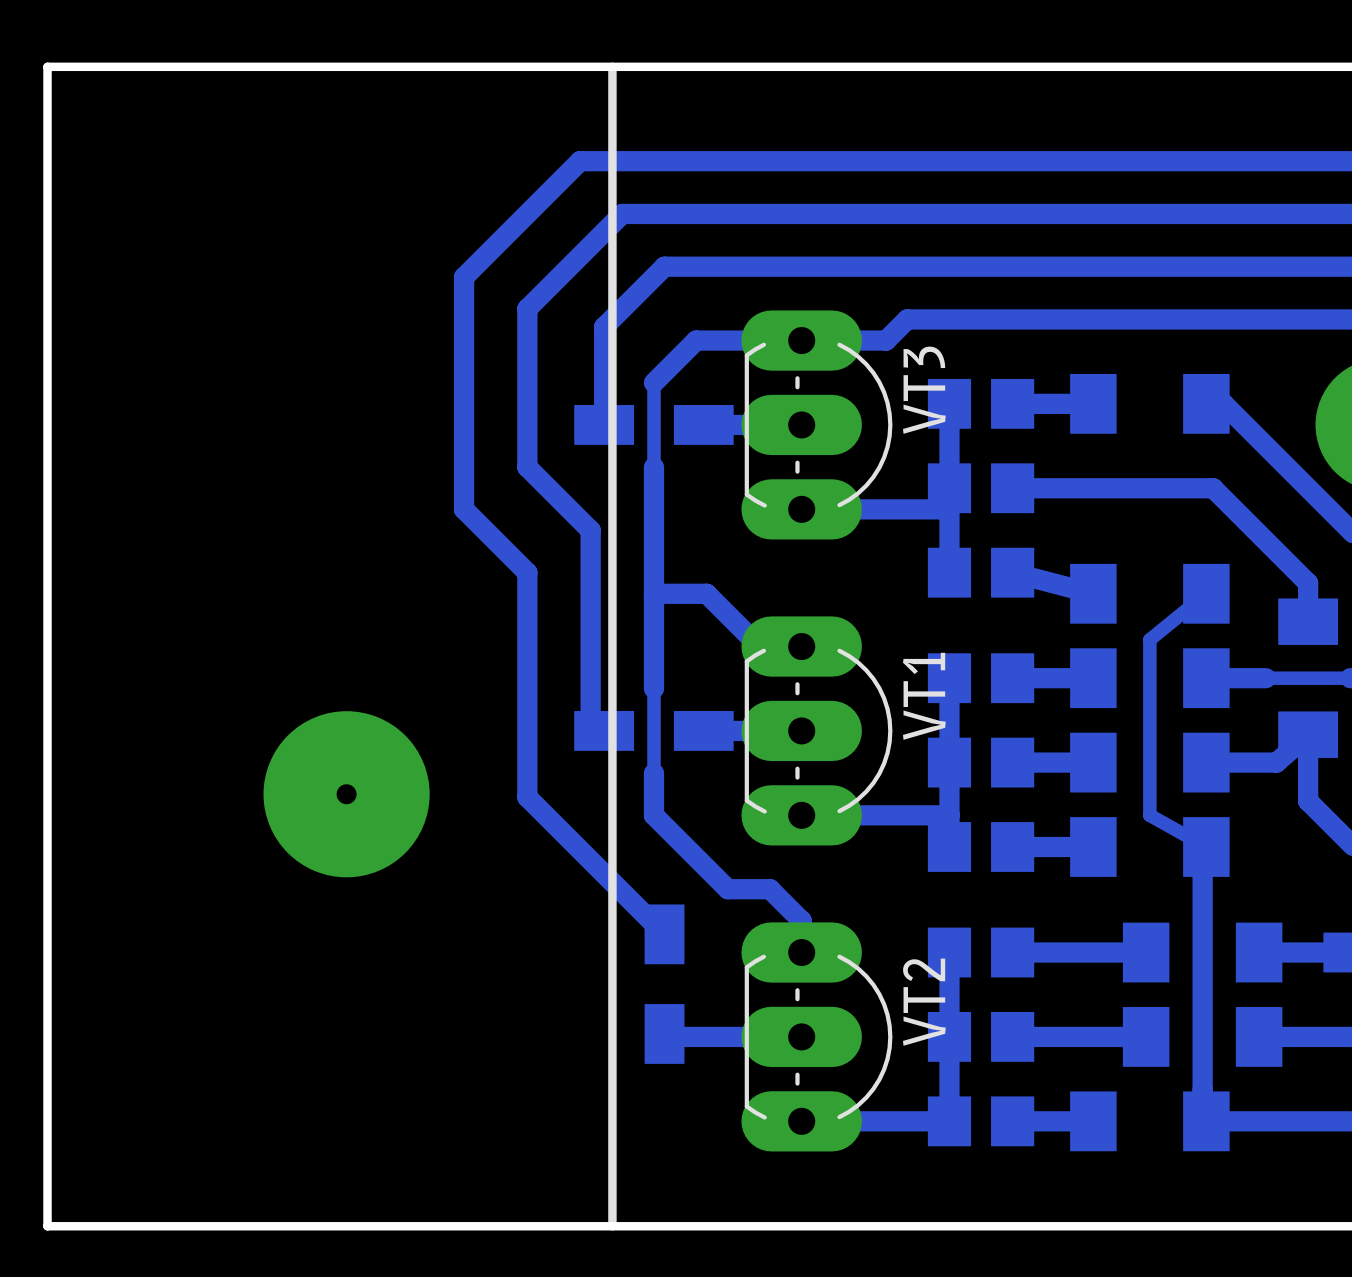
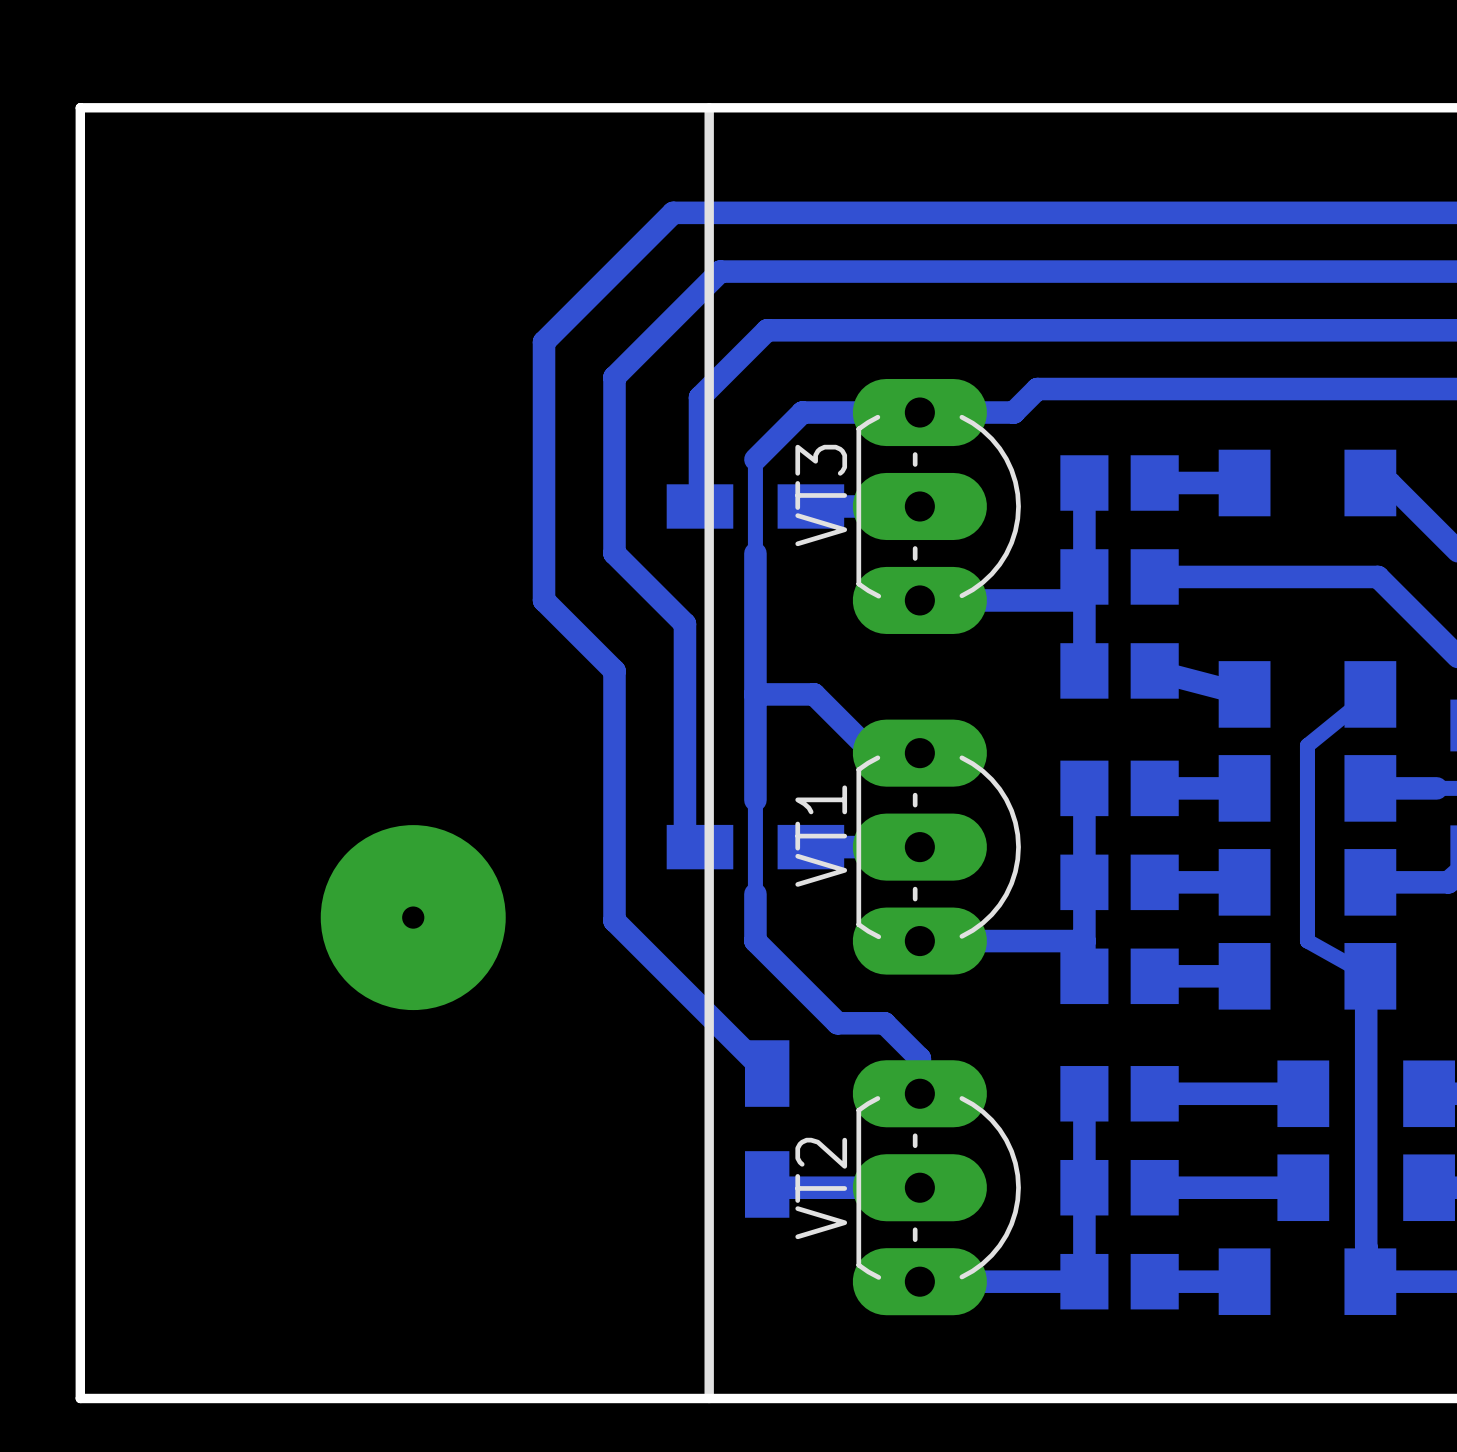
VT3 name position: VT3 (924, 390) -> VT3 (821, 495)
VT1 name position: VT1 (924, 696) -> VT1 (821, 836)
VT2 name position: VT2 (924, 1002) -> VT2 (821, 1188)

